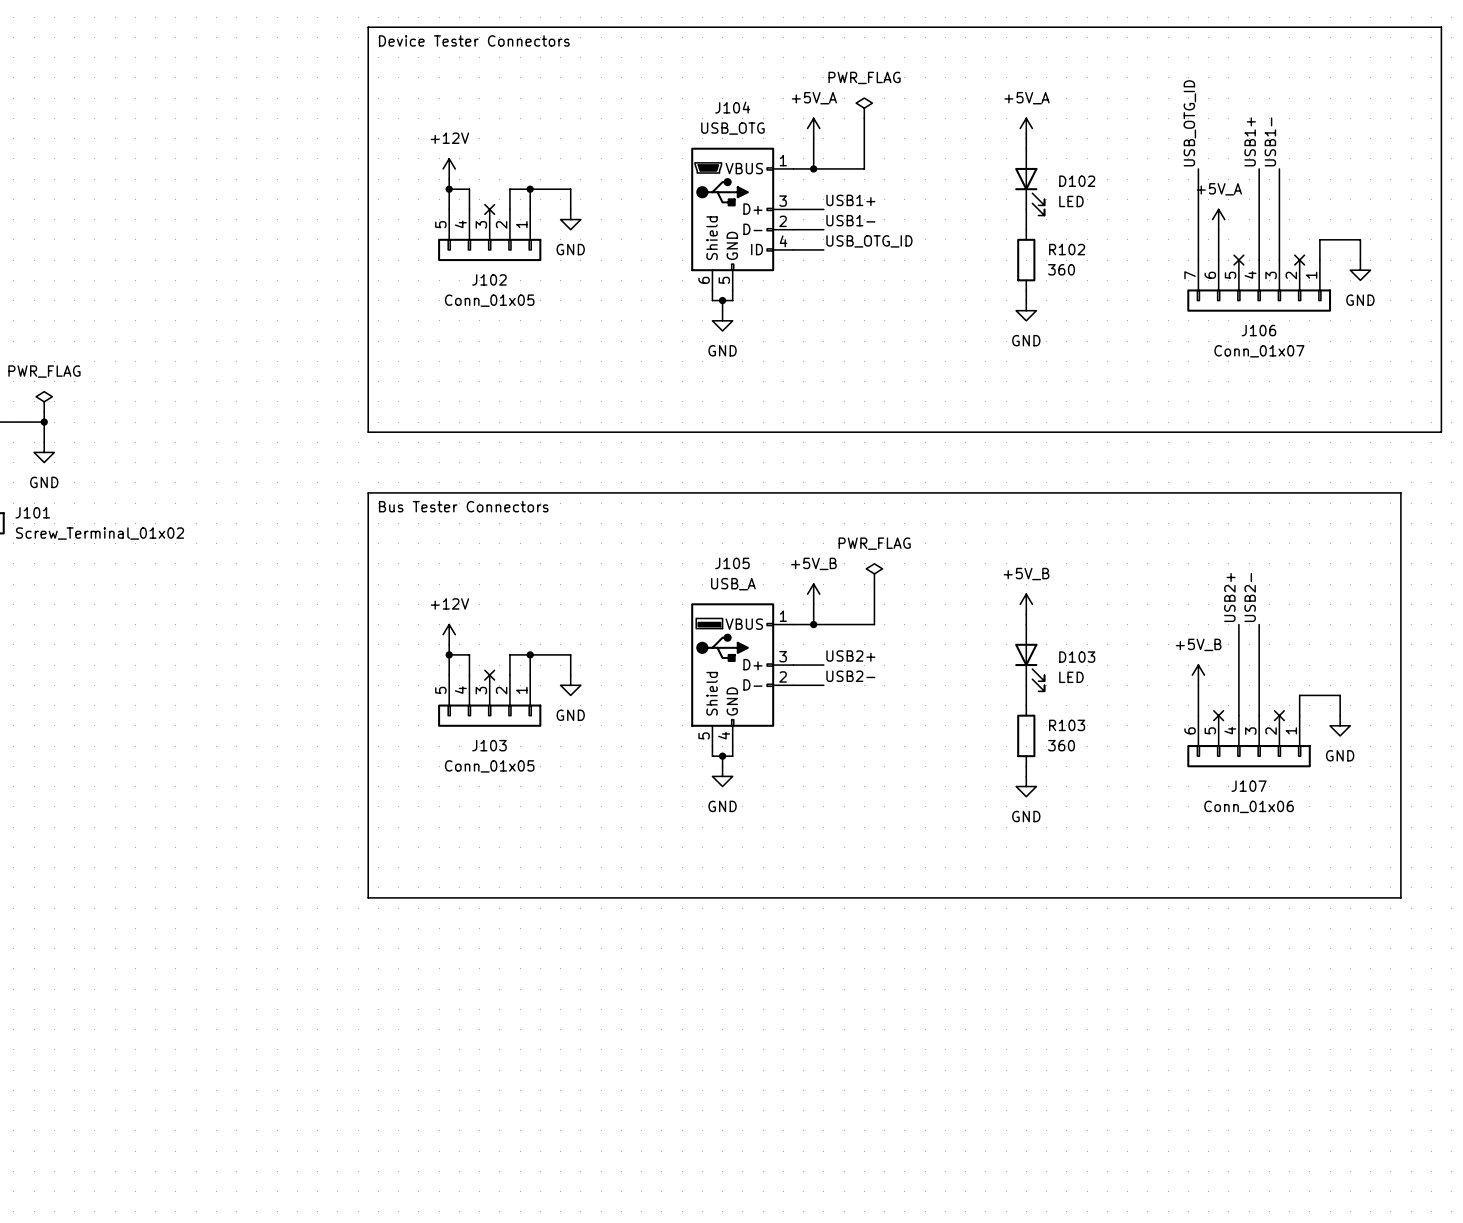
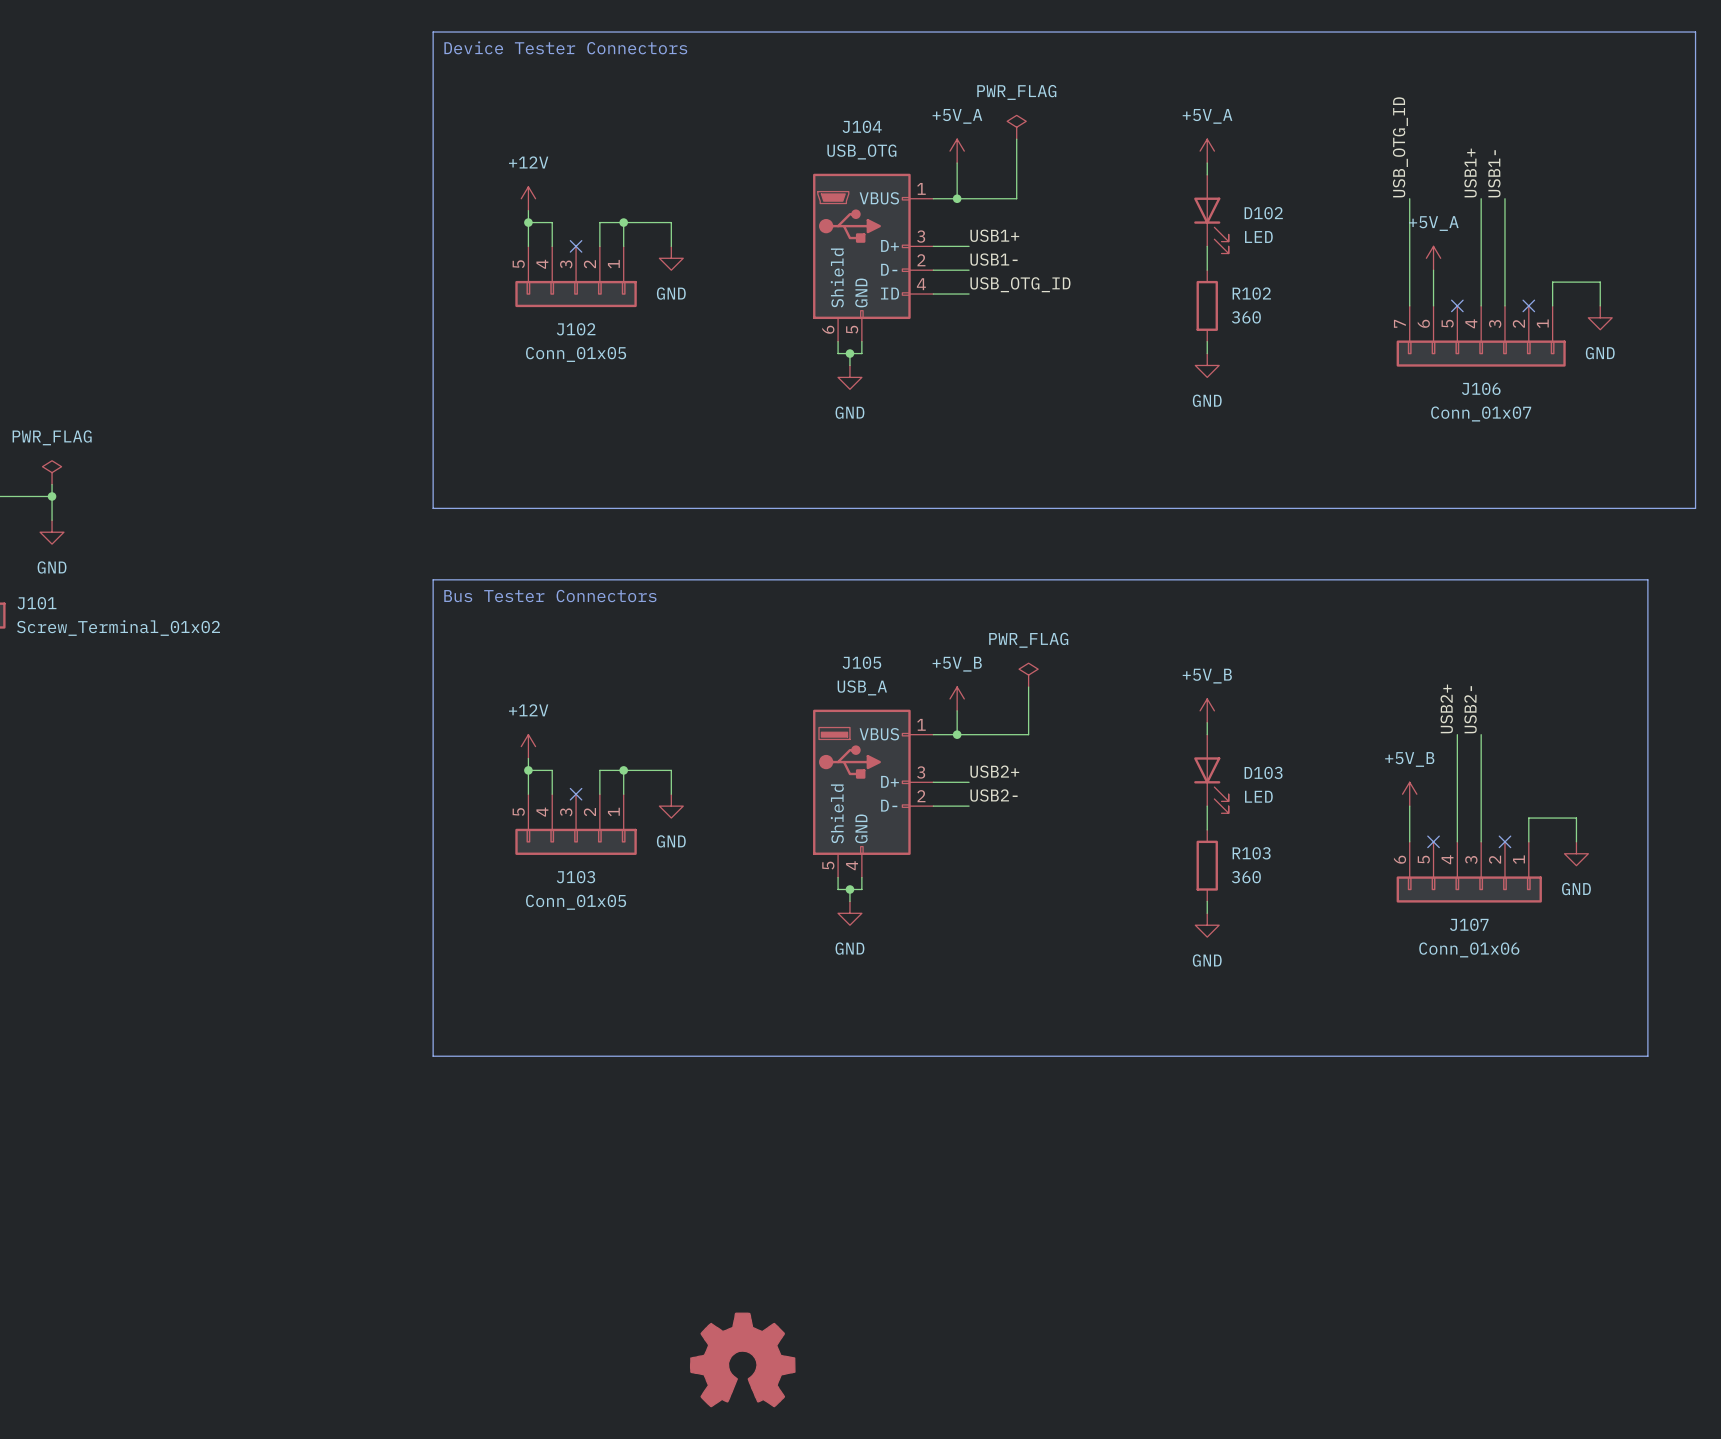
power symbol: none -> (742, 1359)

